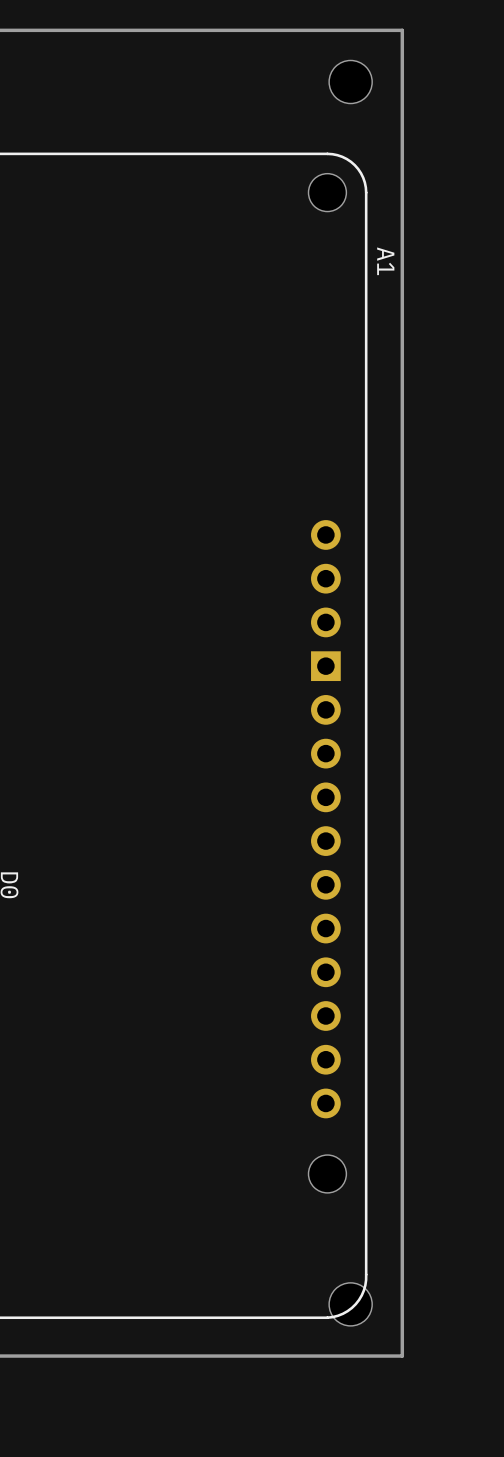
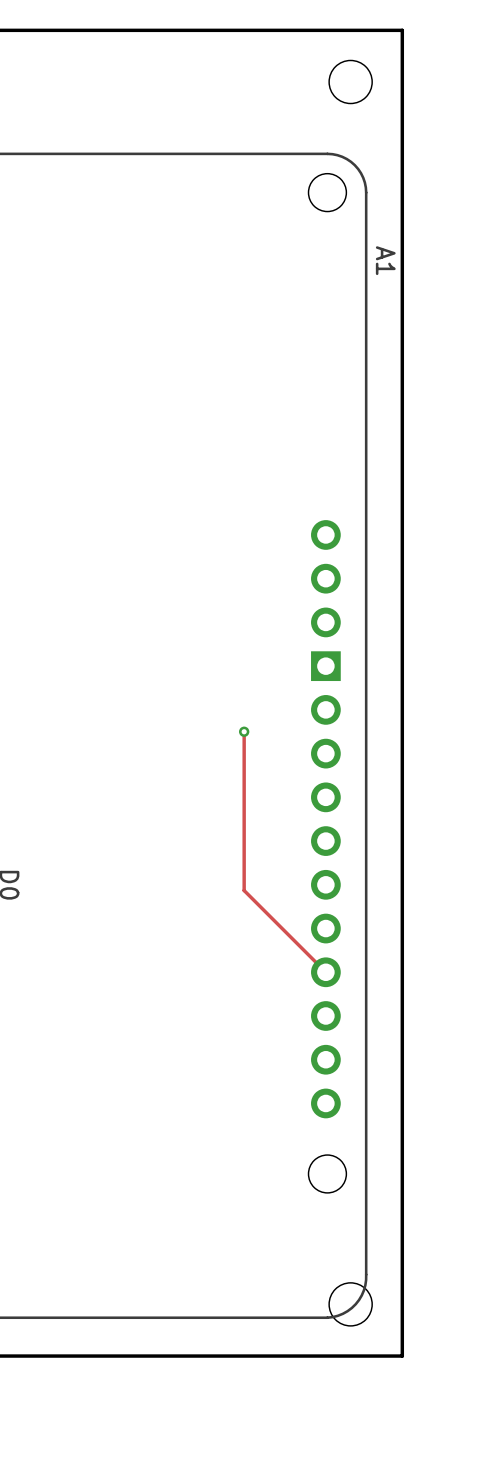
track: none -> (244, 731) (244, 890) (325, 972)
via: none -> (244, 731)

